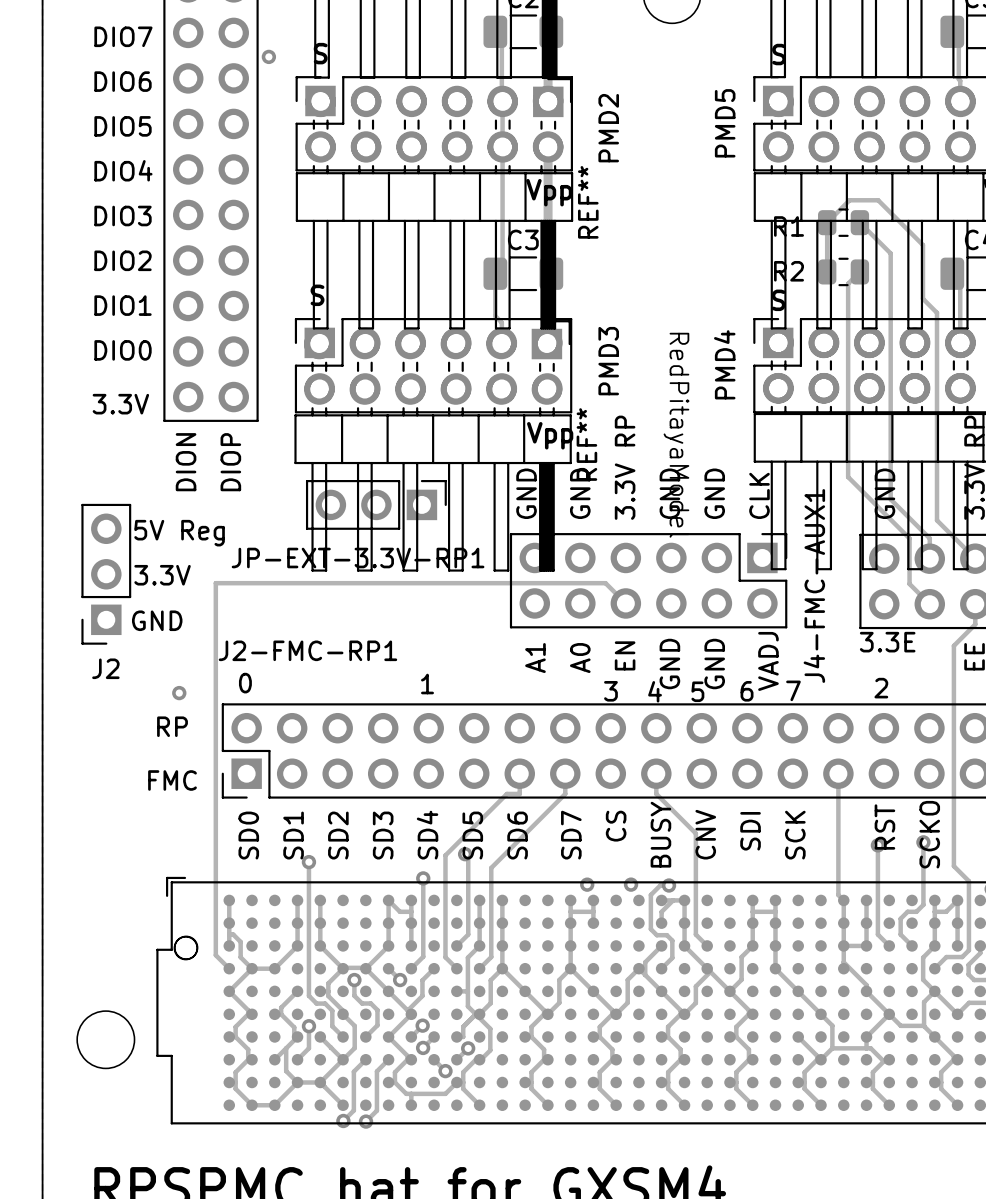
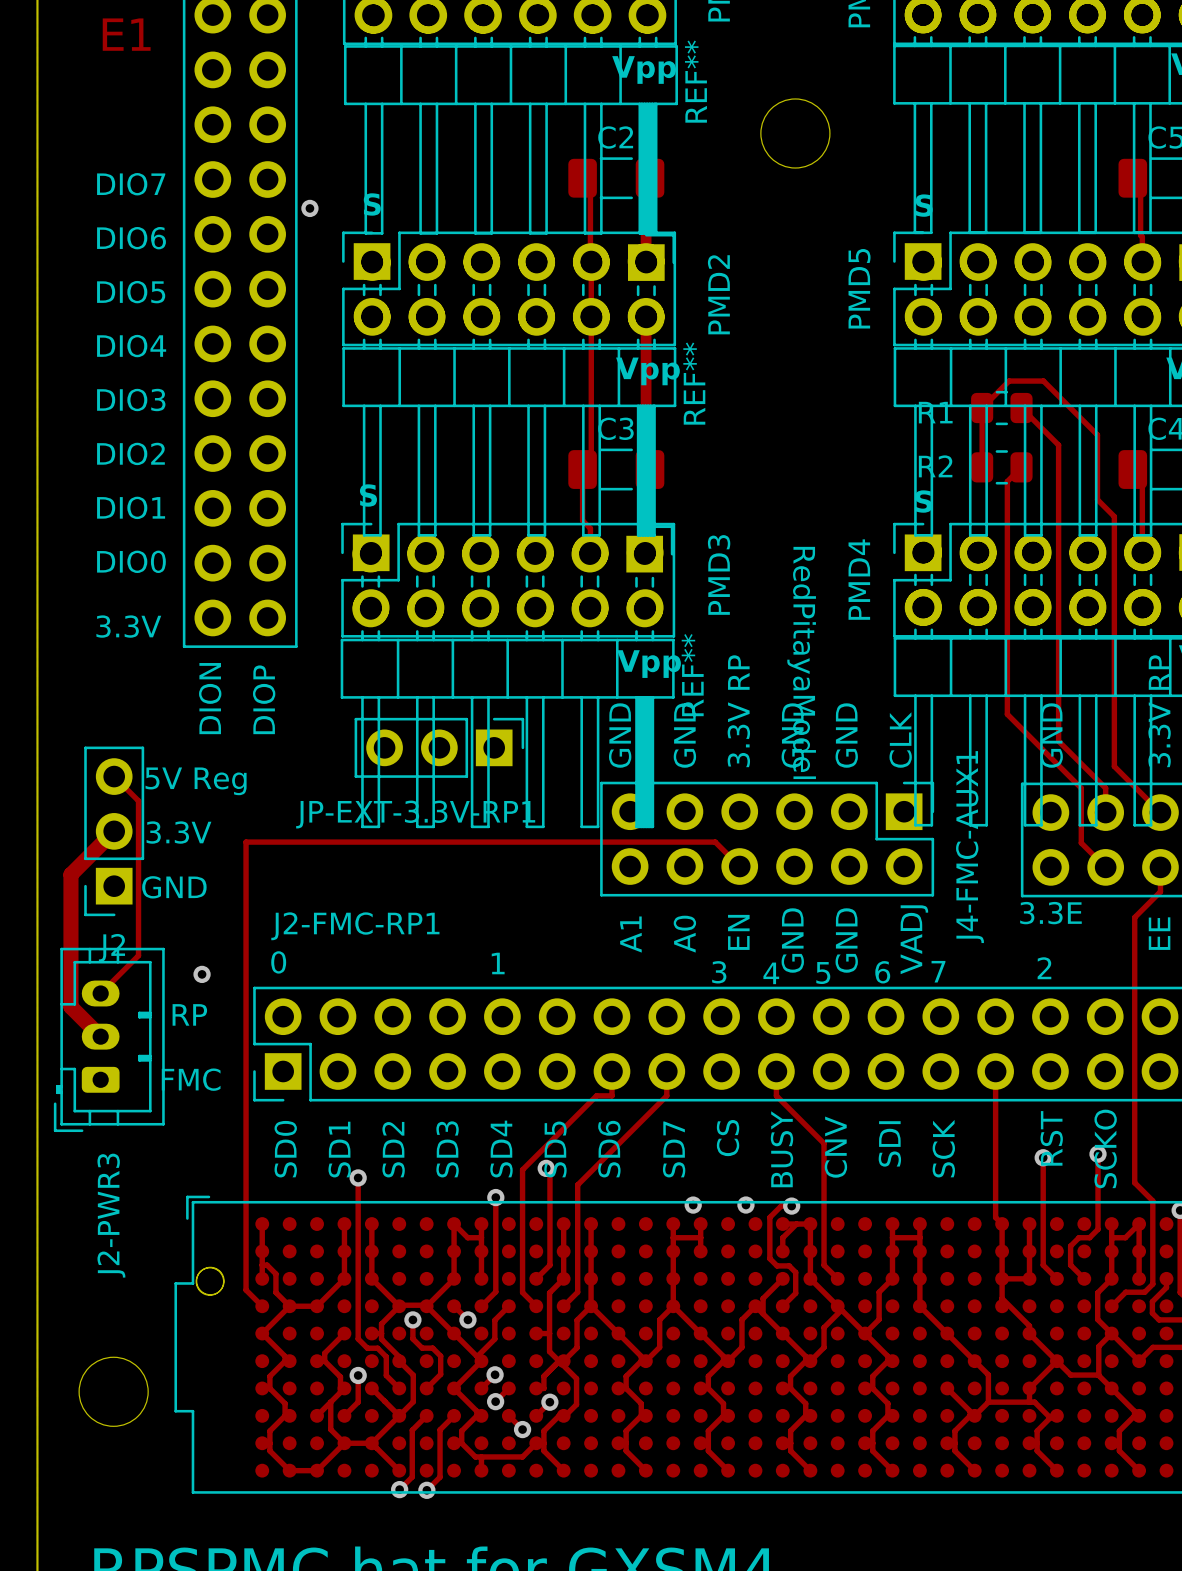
track: none -> (114, 776) (138, 800) (138, 955) (100, 993)
track: none -> (114, 831) (70, 874) (70, 1006) (100, 1036)
J2-PWR3: none -> (109, 1039)

